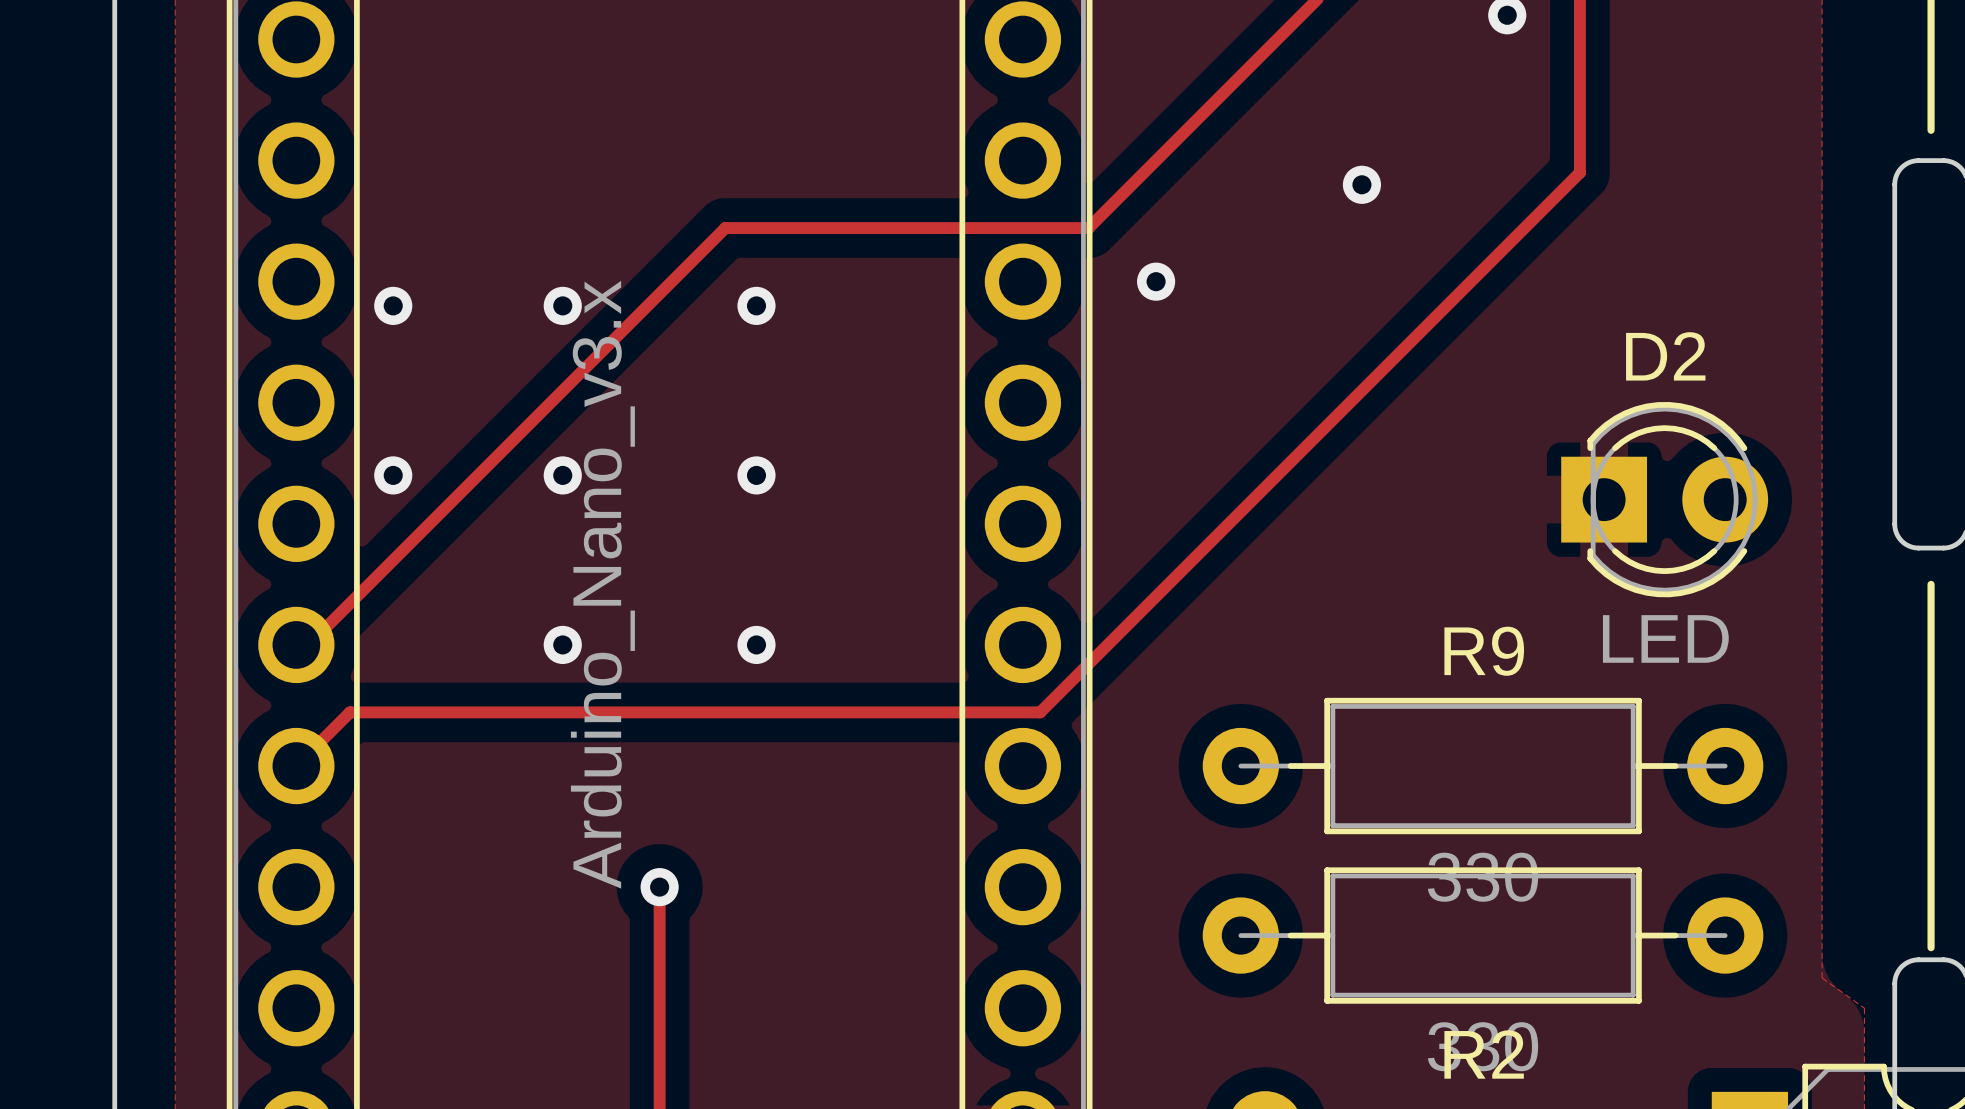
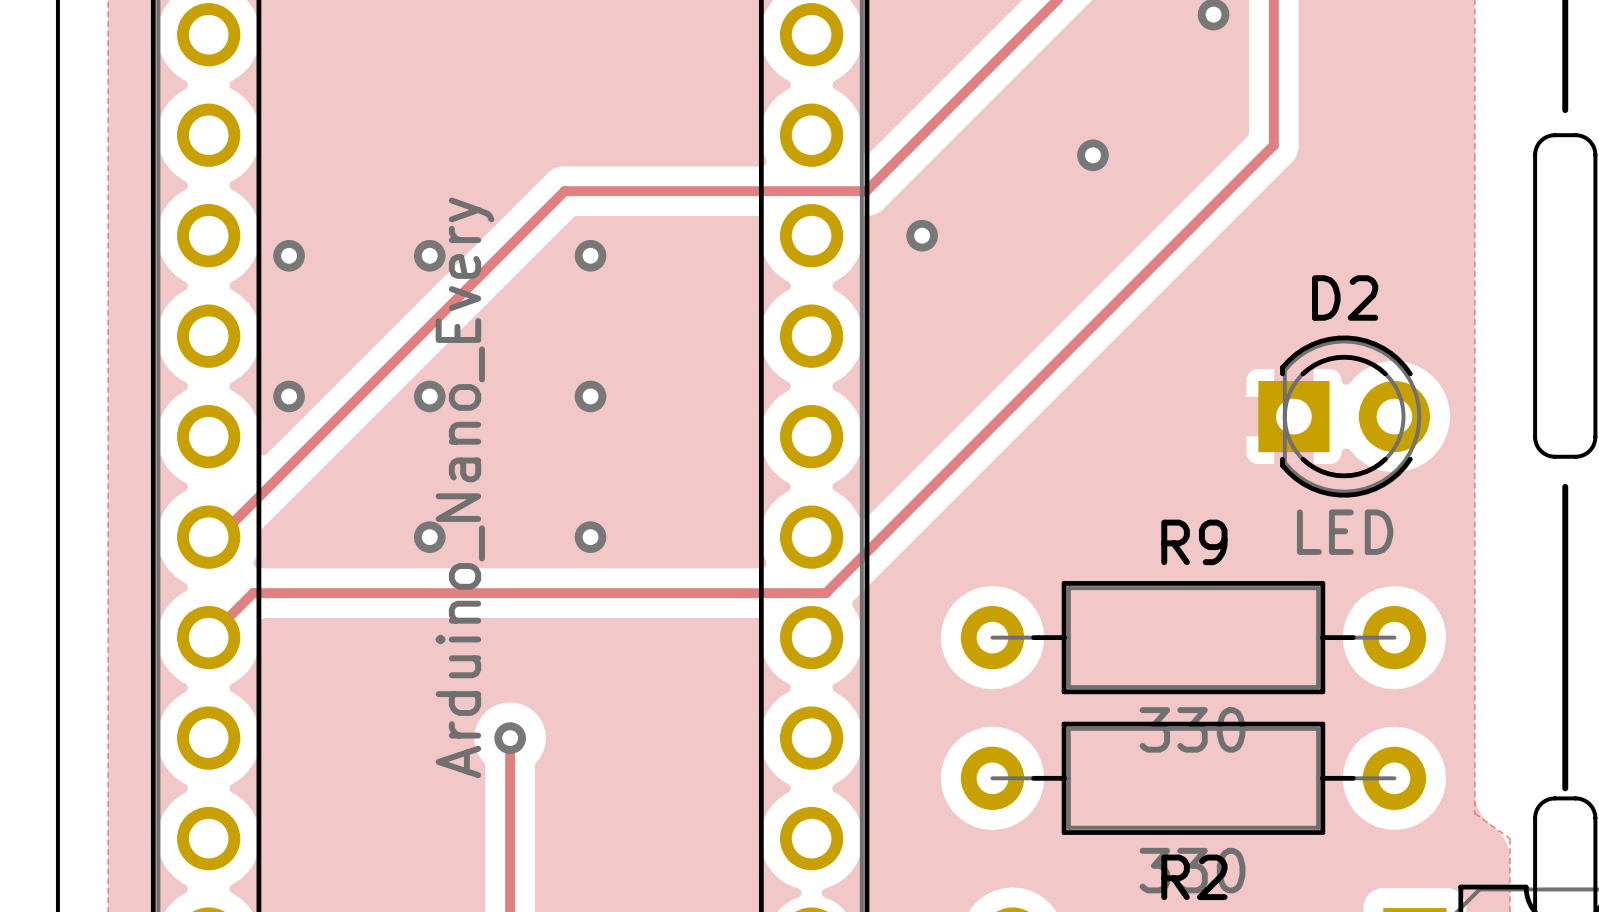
part value: Arduino_Nano_v3.x (602, 584) -> Arduino_Nano_Every (465, 487)

